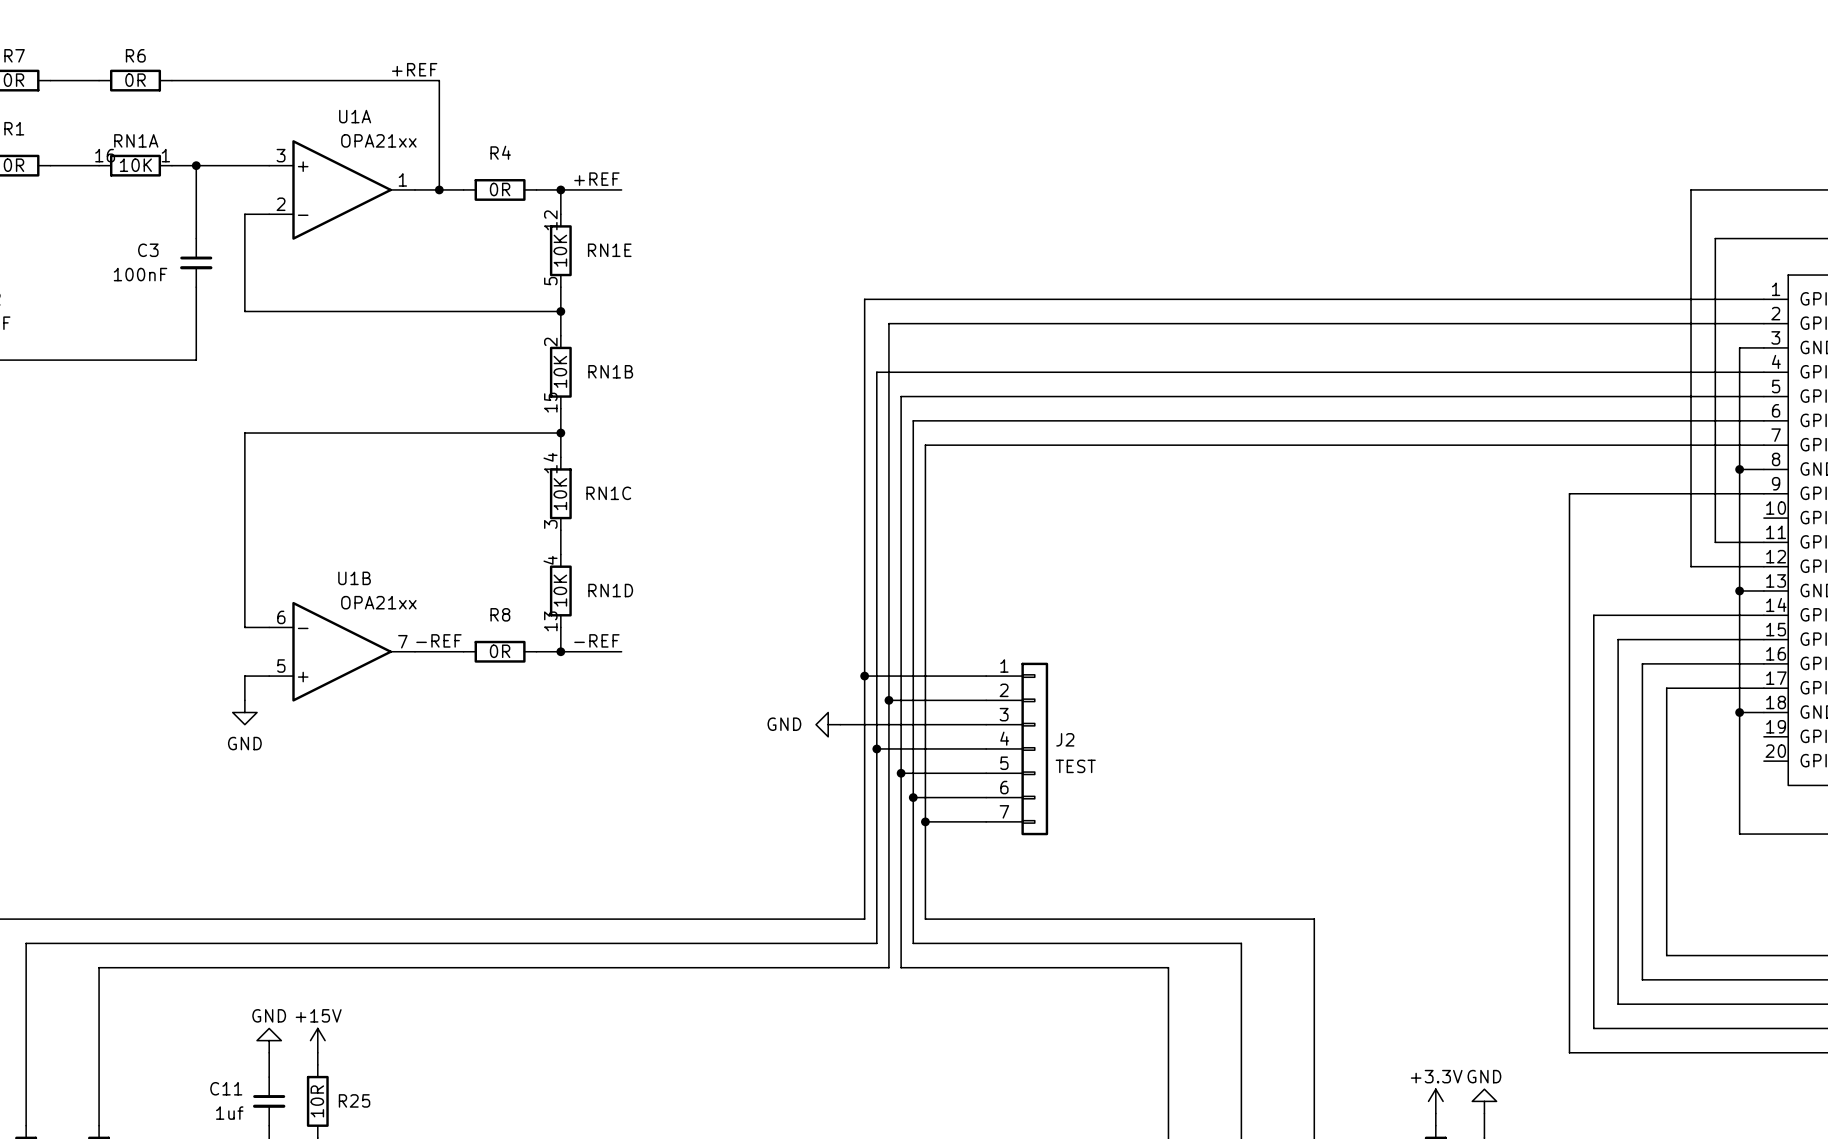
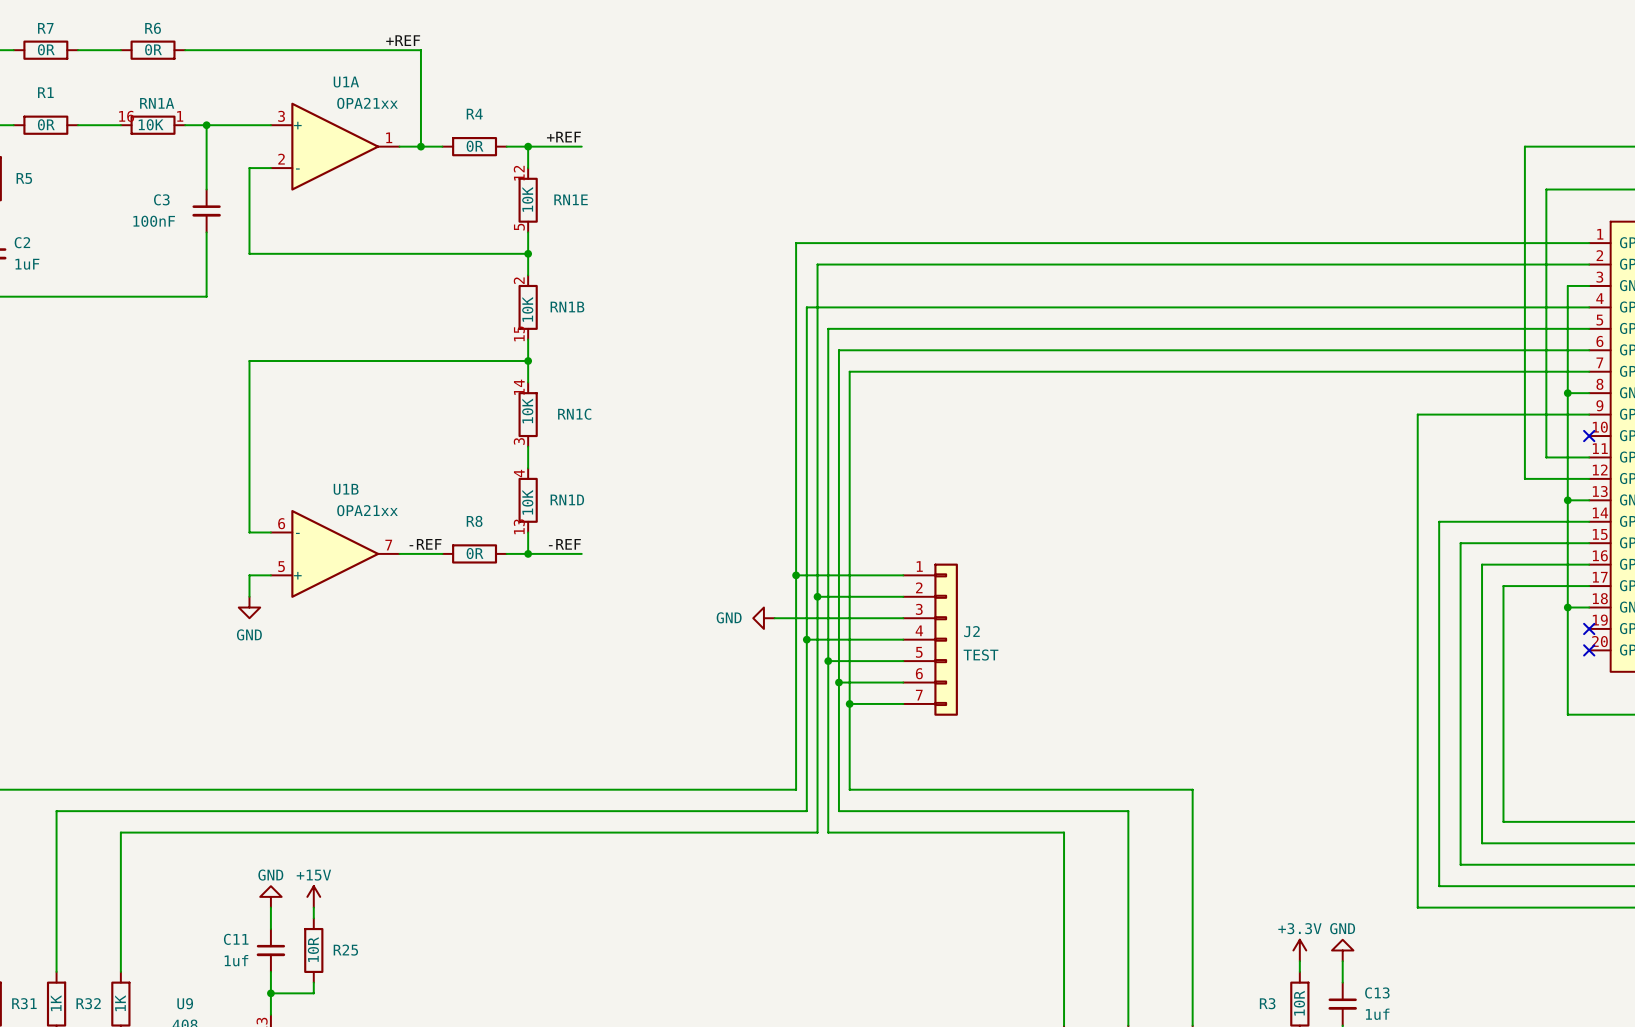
no-connect mark: none -> (1589, 436)
no-connect mark: none -> (1589, 628)
no-connect mark: none -> (1589, 650)

